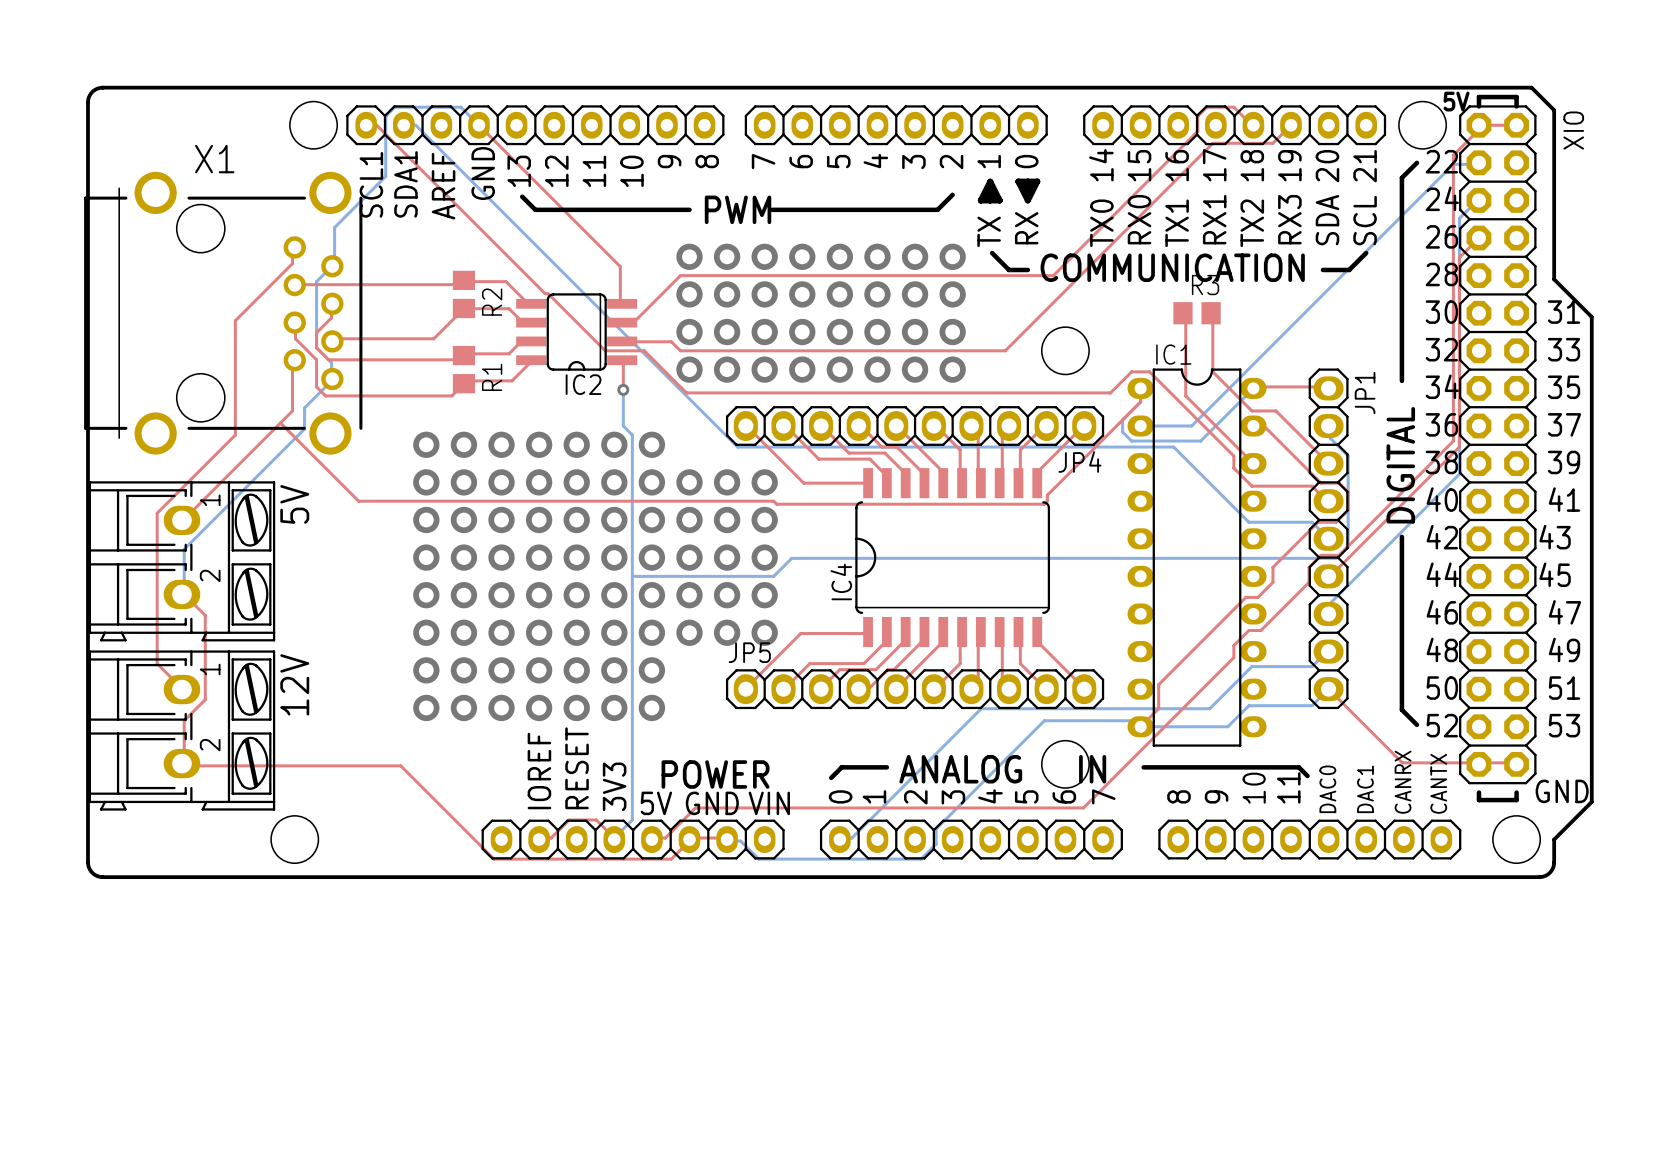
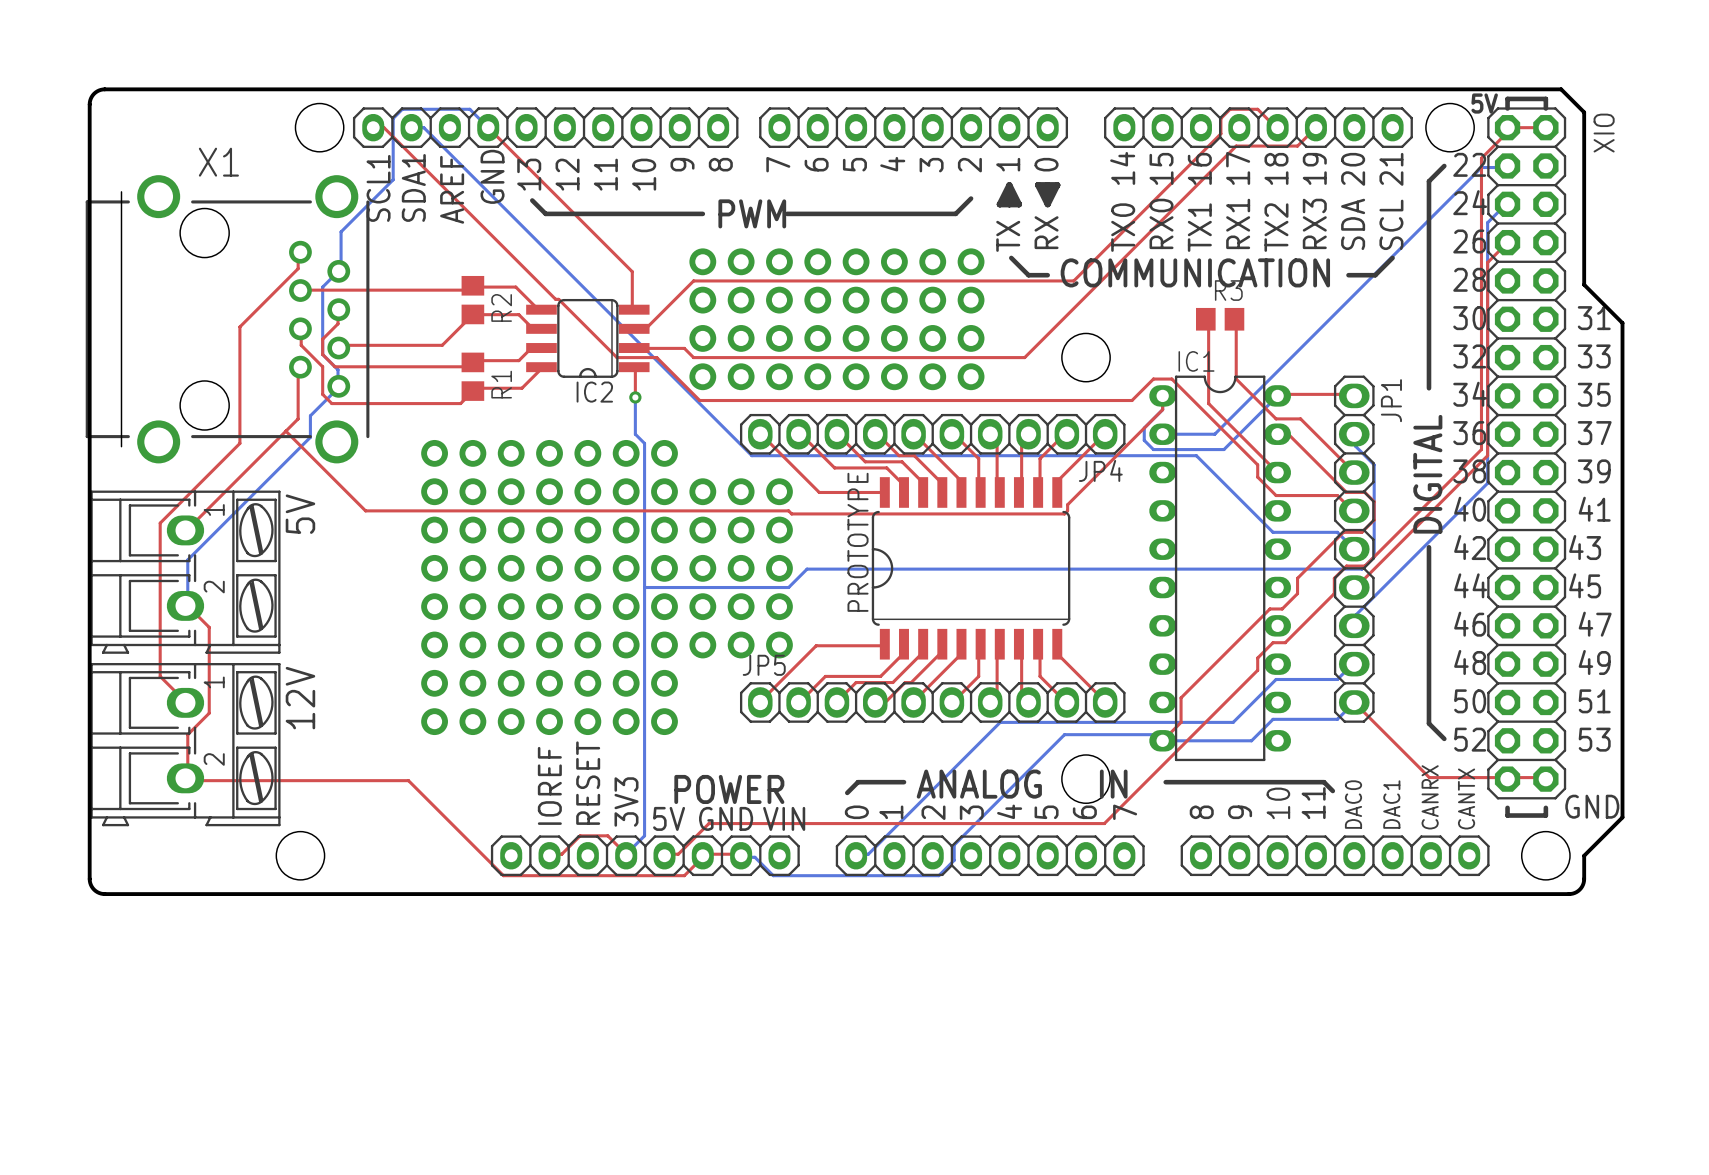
IC4 name: IC4 (841, 581) -> PROTOTYPE (858, 542)

